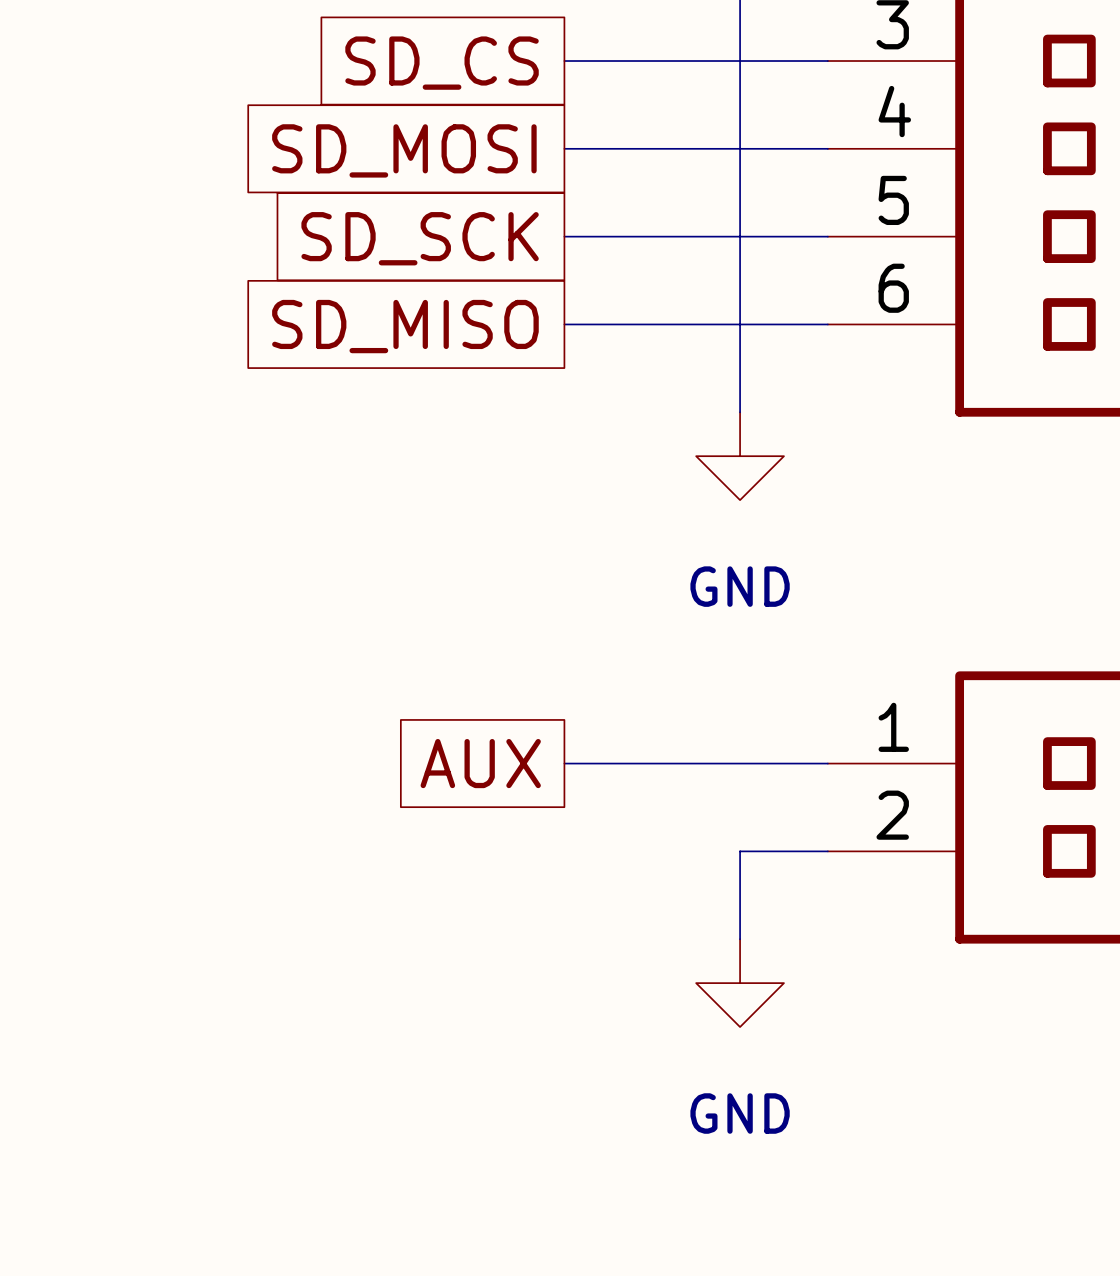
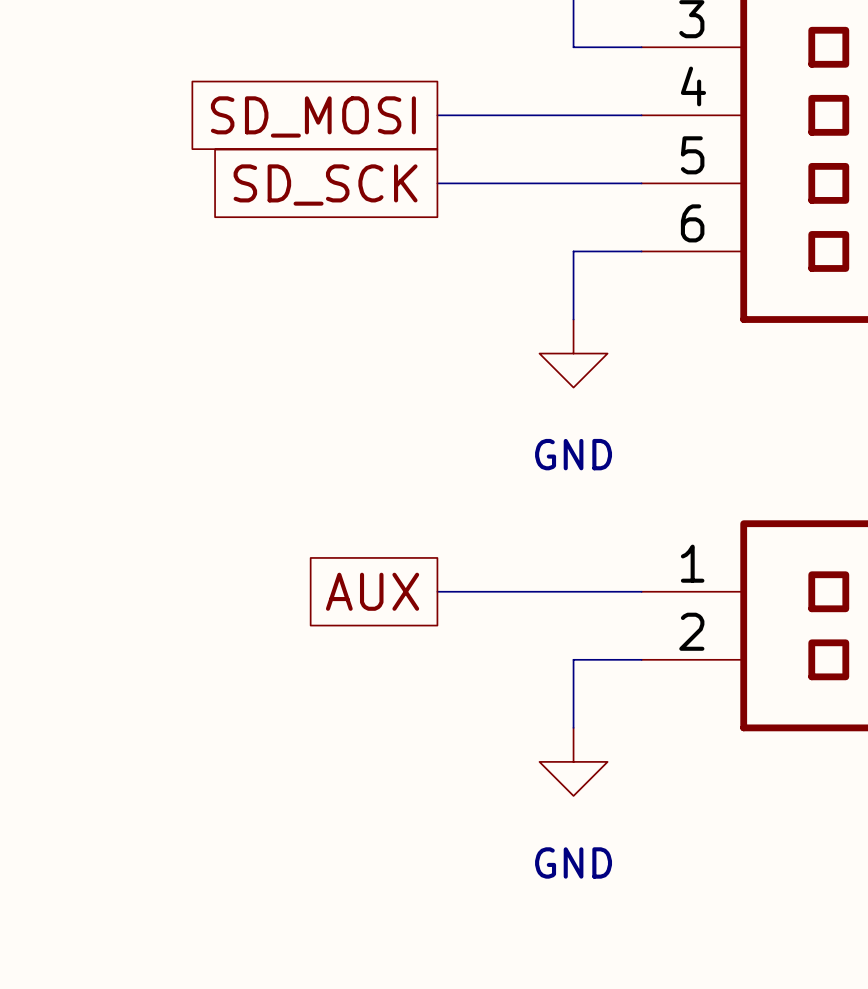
wire: (564, 61) (740, 61) (740, 324) (564, 324) -> none
global label: SD_CS (442, 63) -> none
global label: SD_MISO (405, 326) -> none

